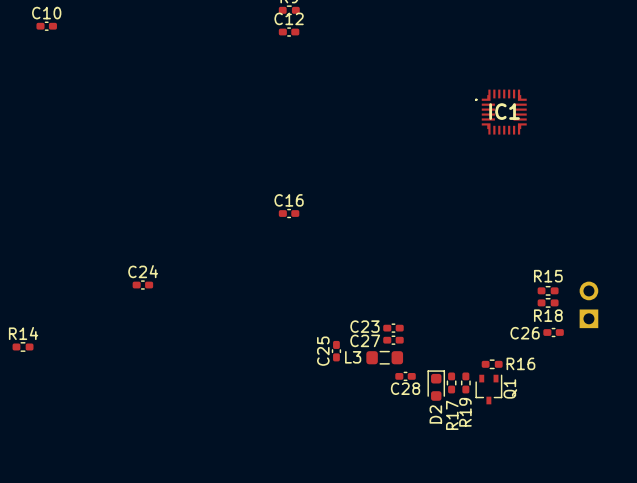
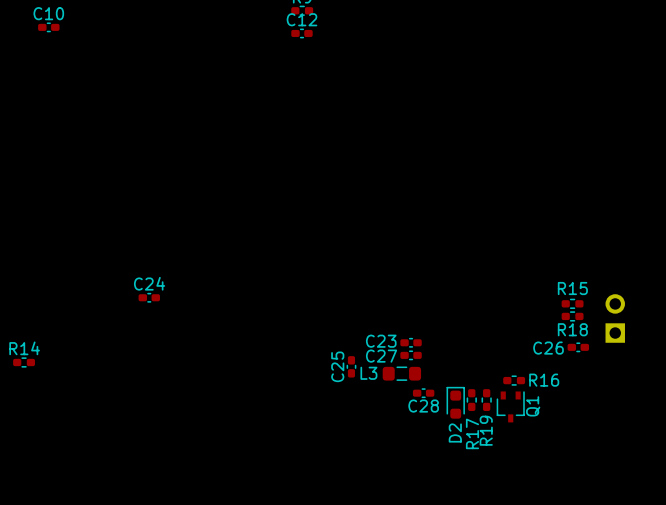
IC1: (500, 112) -> none
C16: (289, 213) -> none

